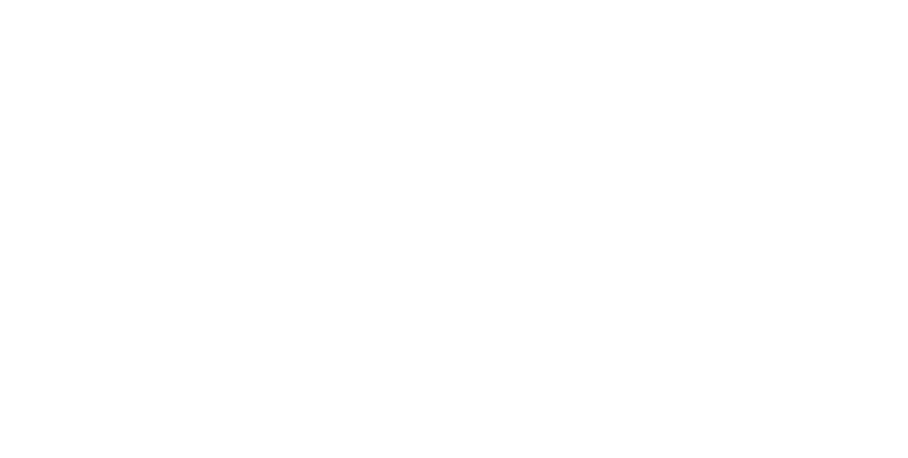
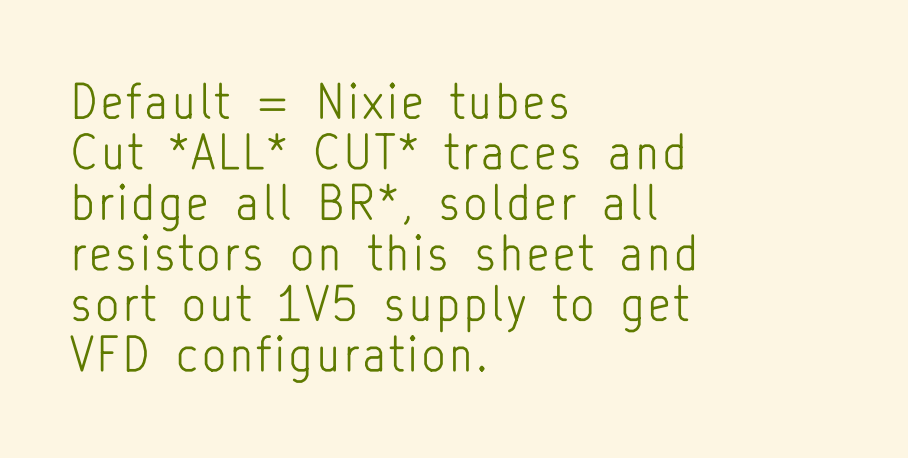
text: none -> Default = Nixie tubes (320, 100)
text: none -> Cut *ALL* CUT* traces and (377, 151)
text: none -> bridge all BR*, solder all (365, 207)
text: none -> resistors on this sheet and (384, 252)
text: none -> sort out 1V5 supply to get (380, 308)
text: none -> VFD configuration. (277, 359)

